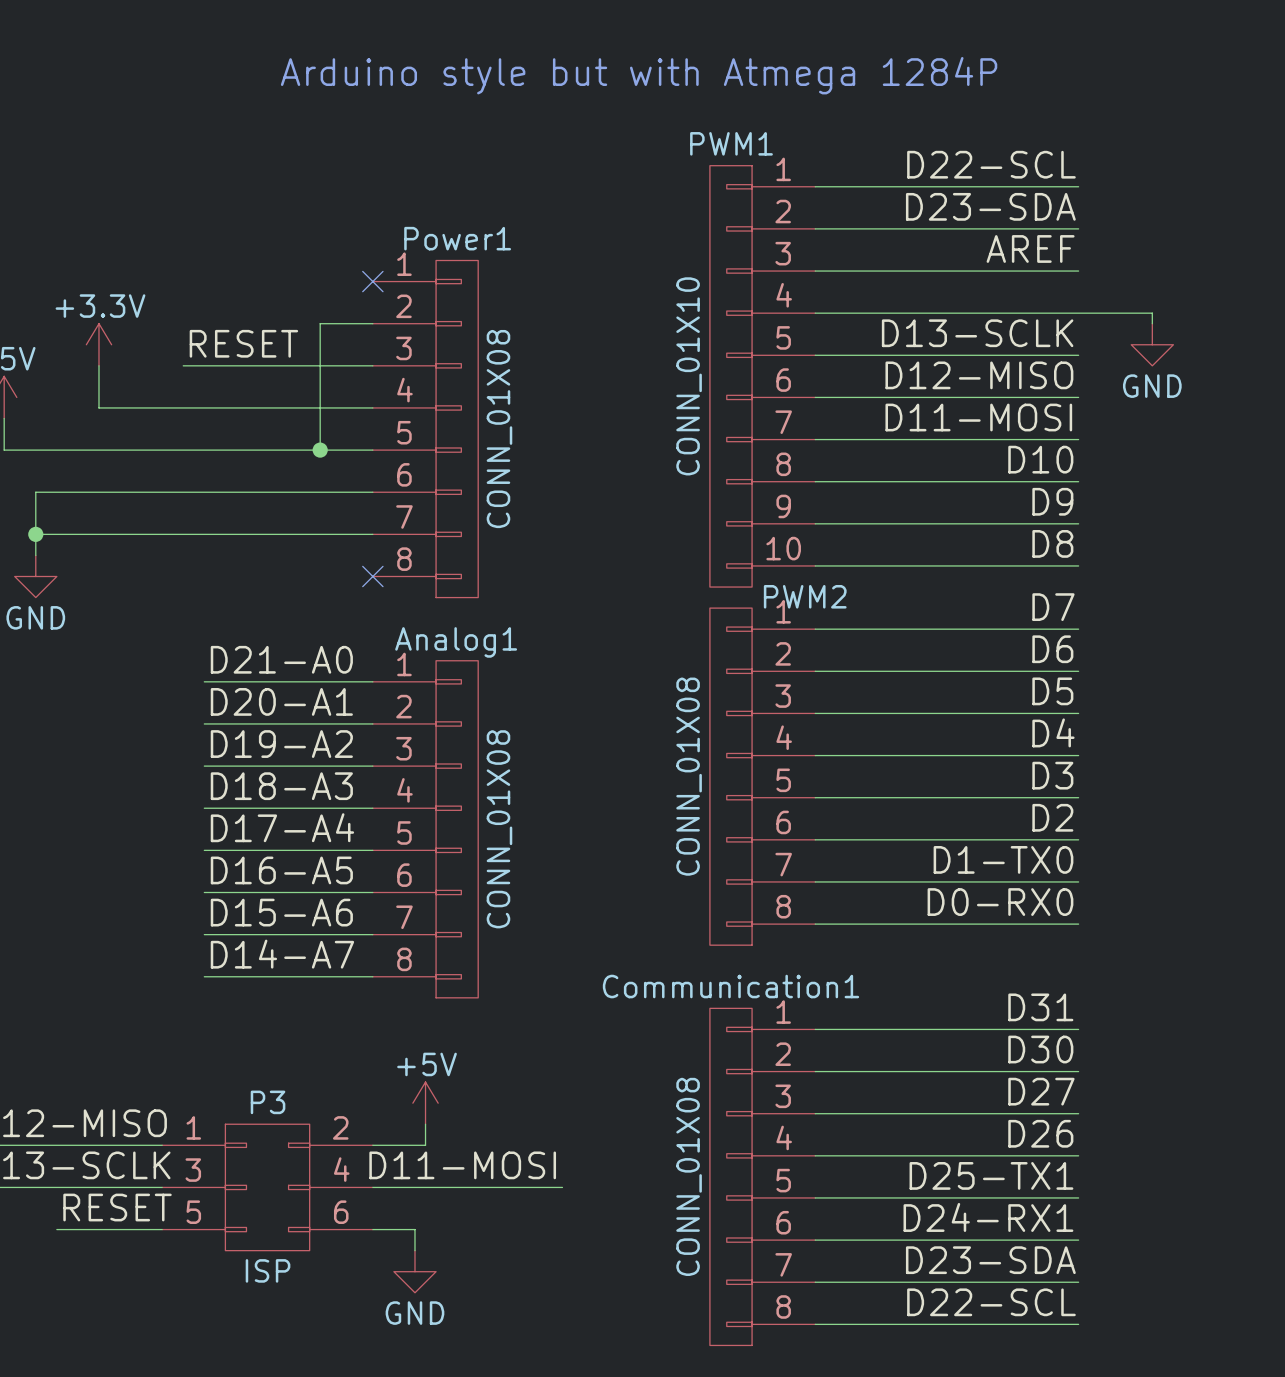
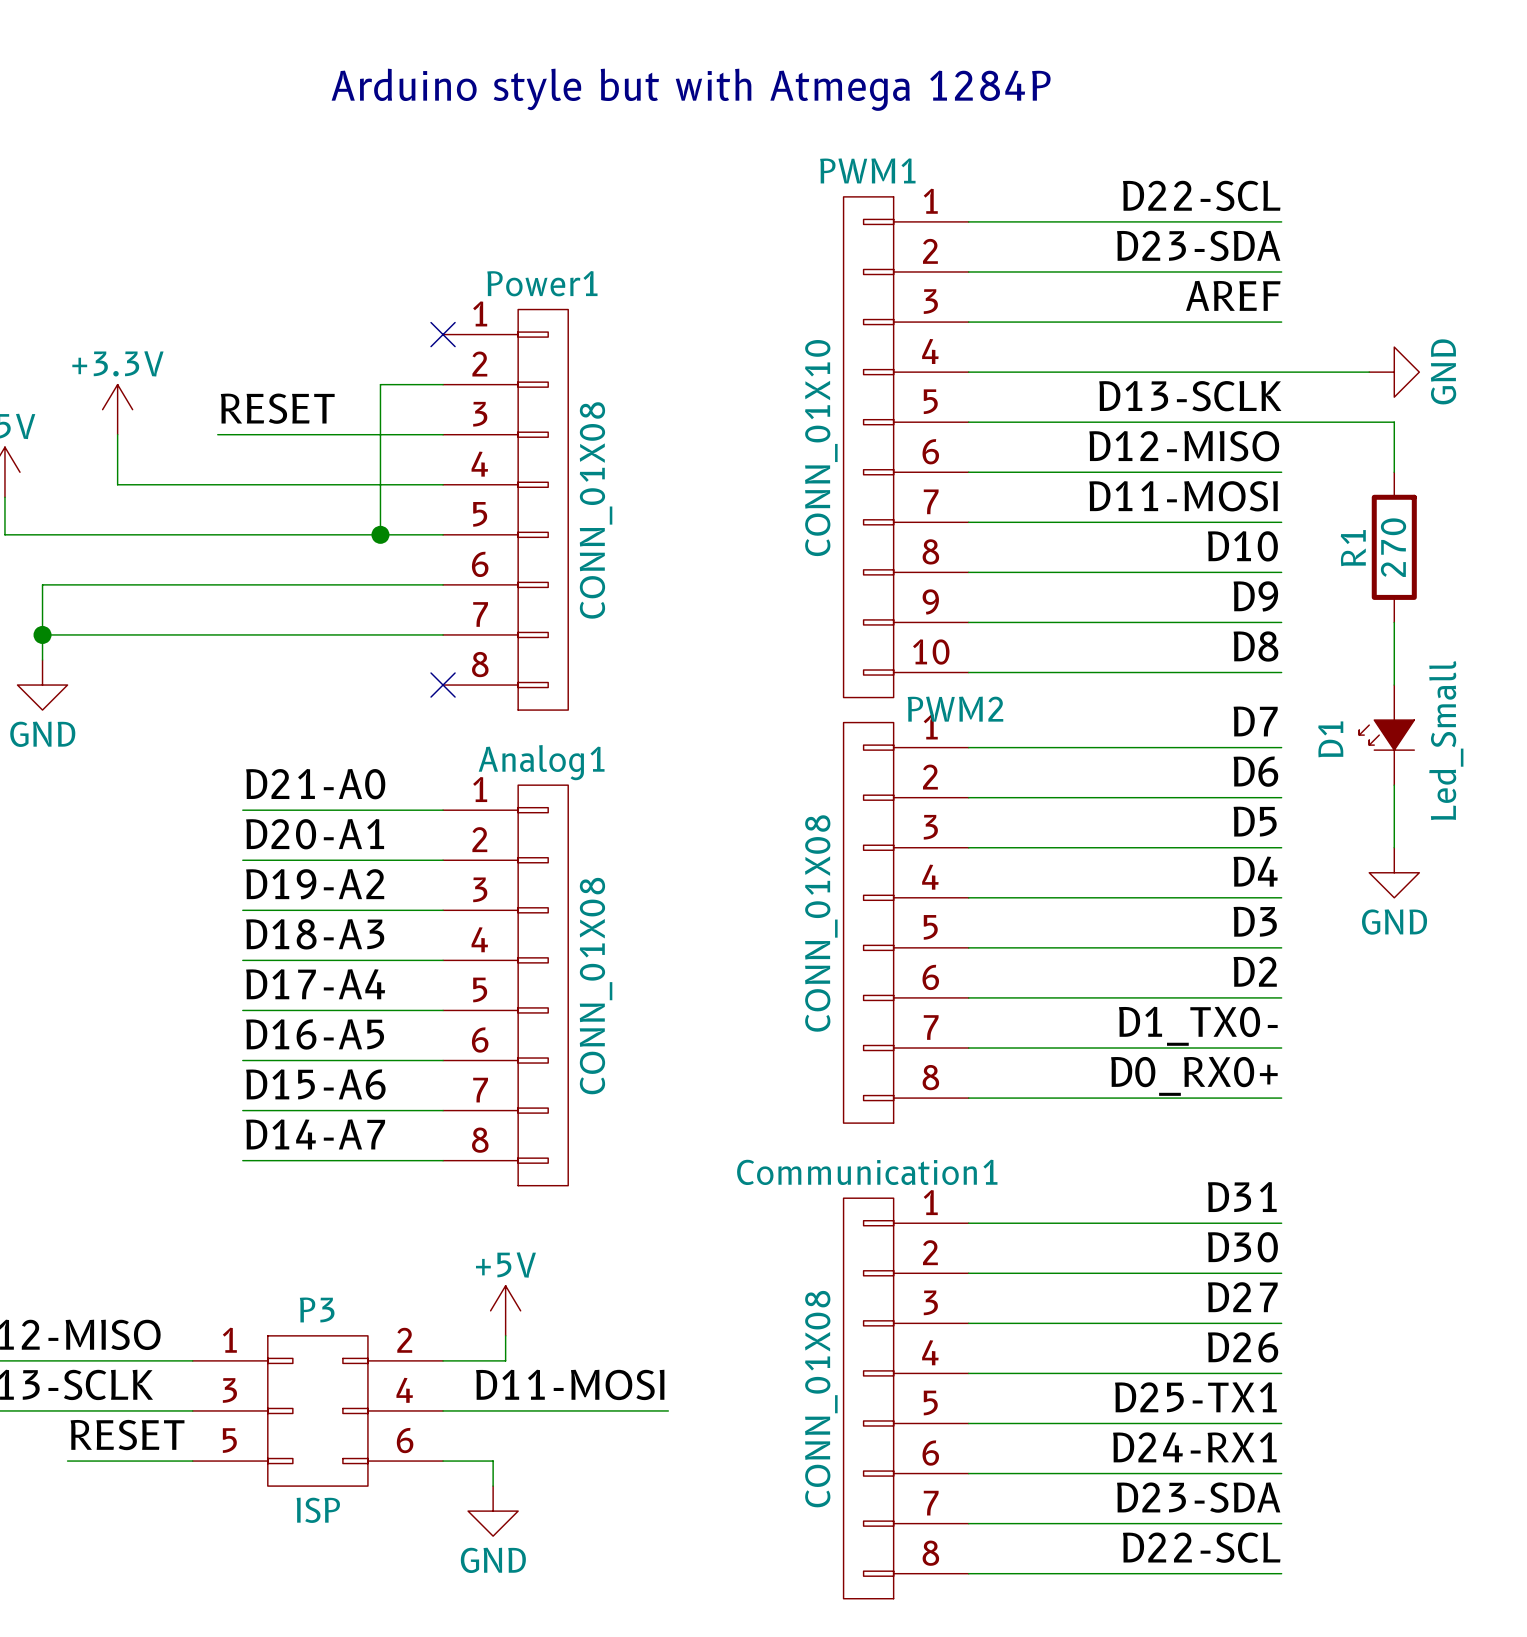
wire: (1152, 313) (1152, 323) -> none
power symbol rotation: 0° (1152, 344) -> 90° counterclockwise (1394, 372)
power symbol position: GND (1152, 344) -> GND (1394, 372)
wire: none -> (1281, 422) (1394, 422) (1394, 472)
R1: none -> 270 (1394, 547)
wire: none -> (1394, 622) (1394, 685)
D1: none -> Led_Small (1386, 735)
wire: none -> (1394, 785) (1394, 847)
power symbol: none -> GND (1394, 872)
label: D1-TX0 (1003, 859) -> D1_TX0- (1198, 1026)
label: D0-RX0 (1000, 902) -> D0_RX0+ (1194, 1076)

